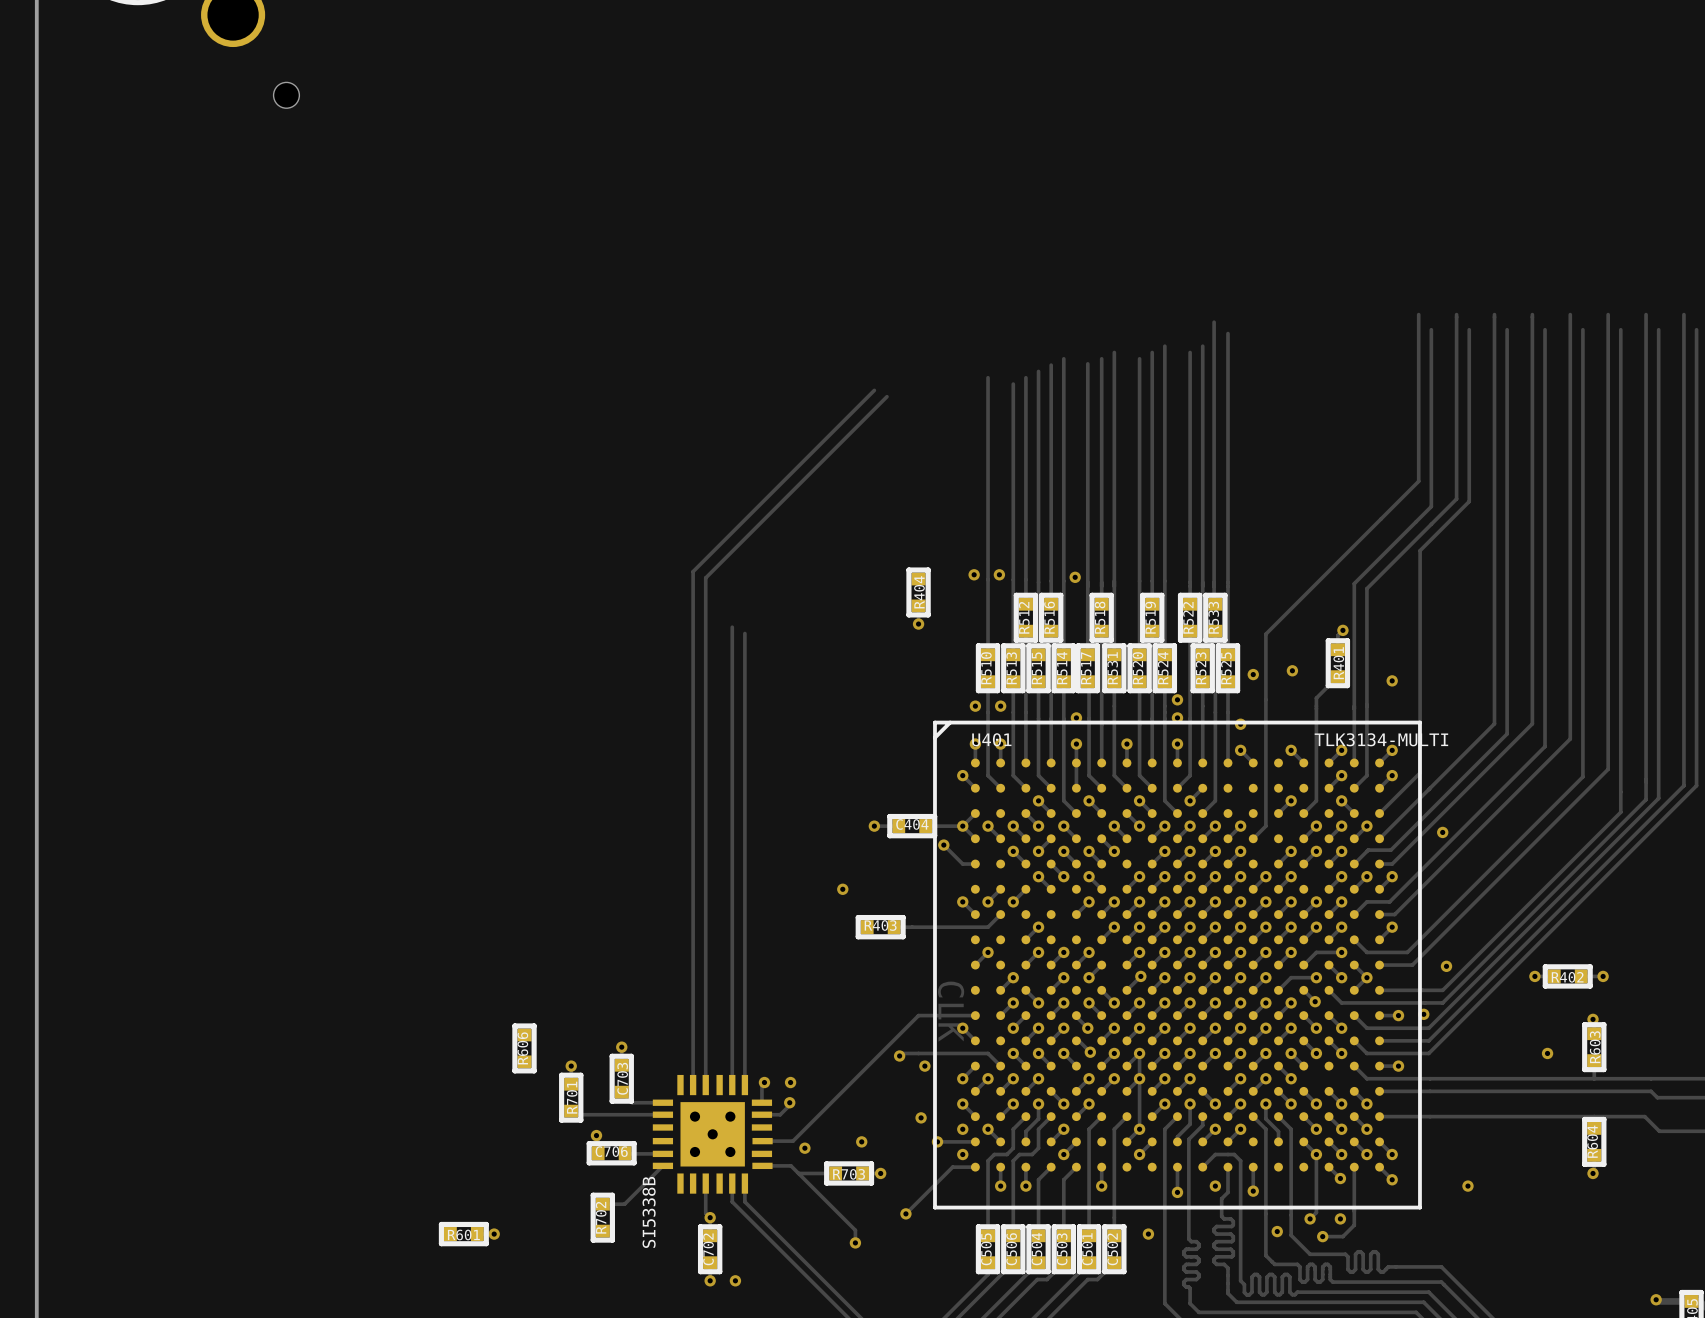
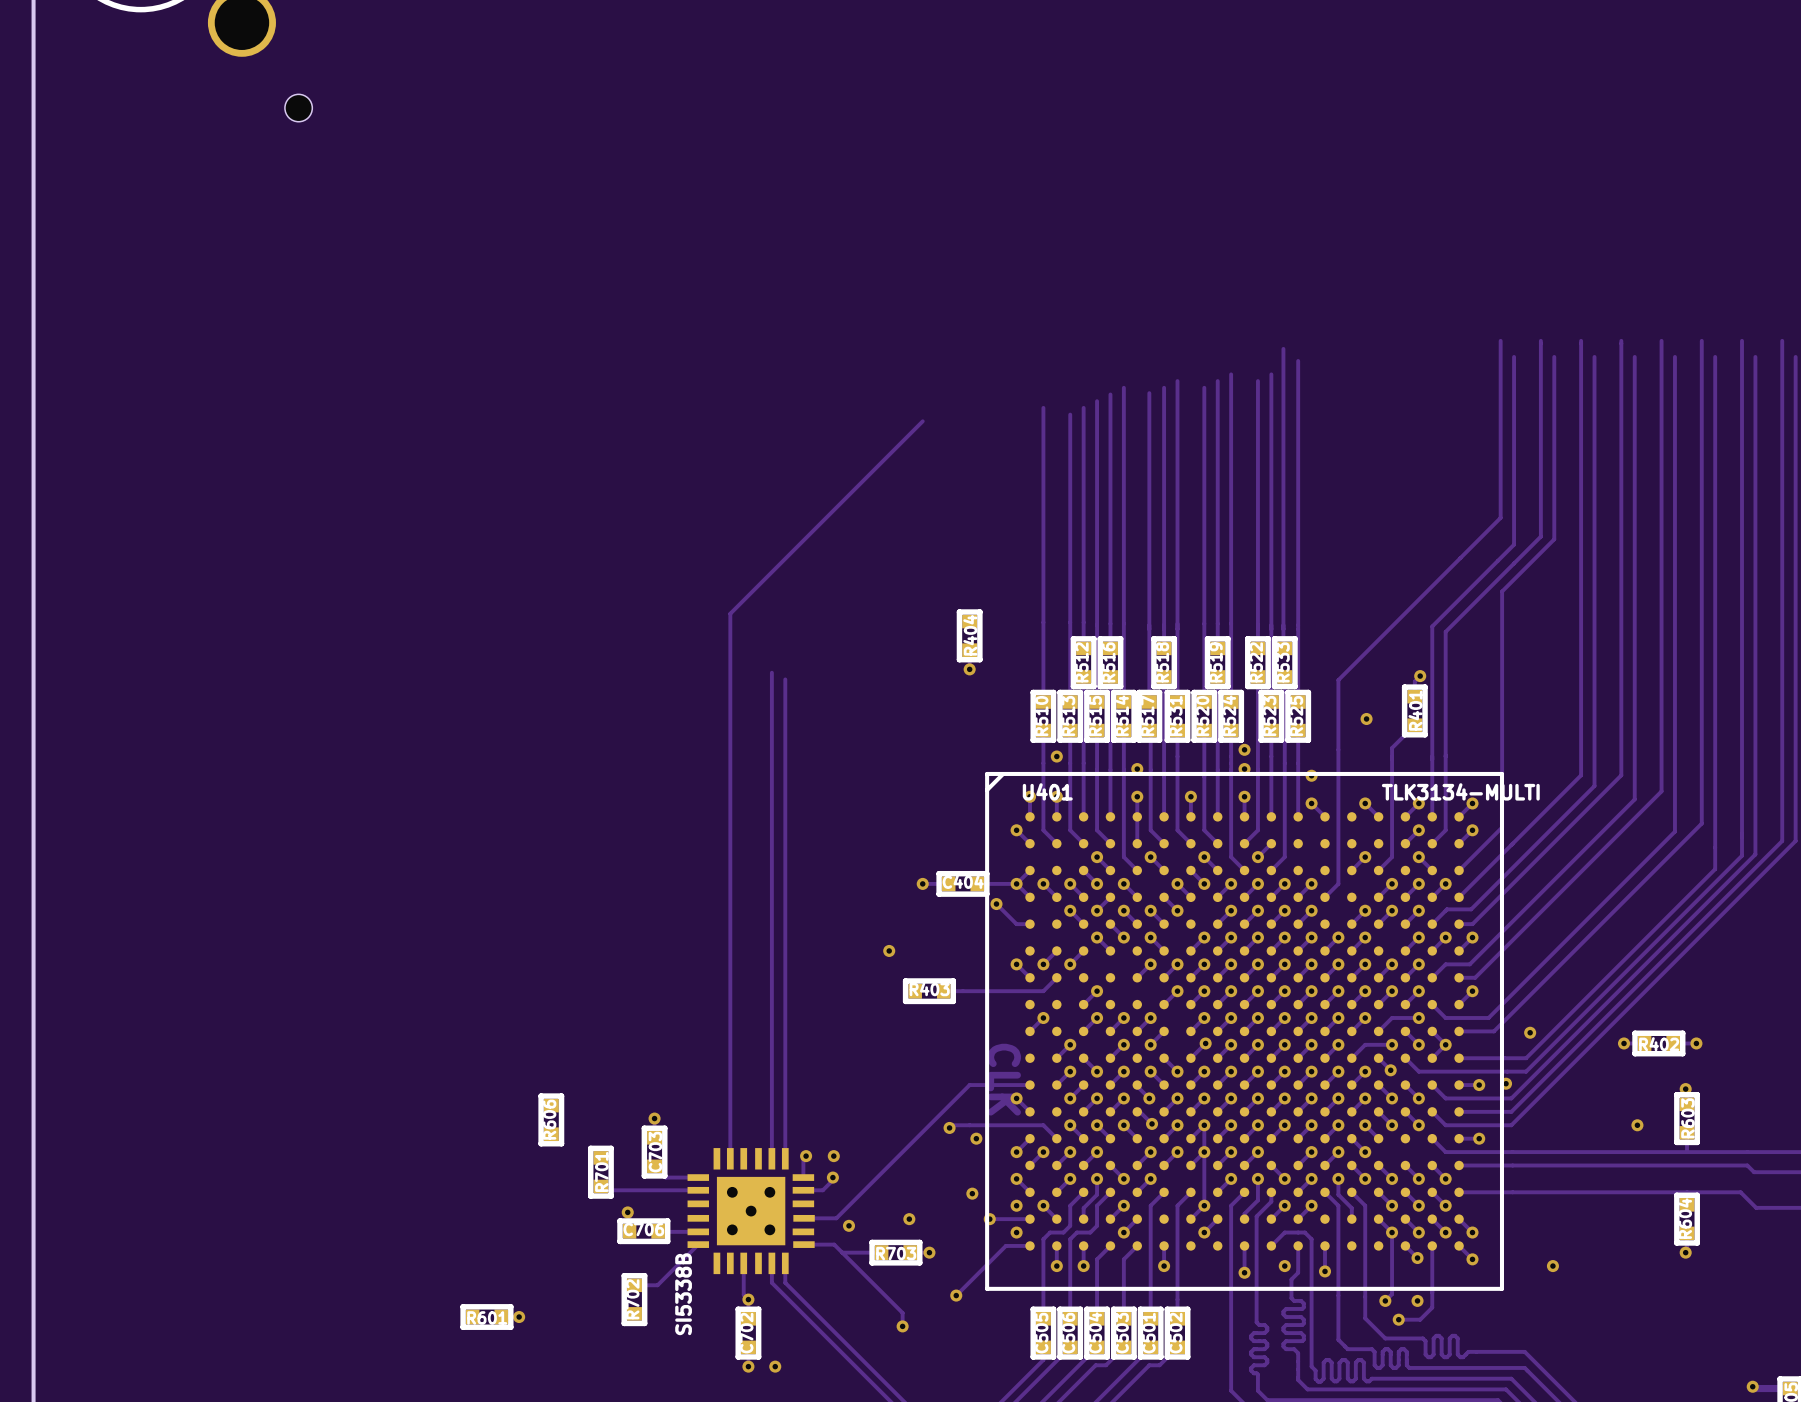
track: (886, 396) (705, 577) (705, 1085) -> none
via: (974, 574) -> none
via: (999, 574) -> none
via: (1075, 577) -> none
via: (1253, 674) -> none
via: (1392, 680) -> none
via: (975, 706) -> none
via: (1442, 832) -> none
via: (571, 1066) -> none
via: (1277, 1231) -> none
via: (1148, 1234) -> none

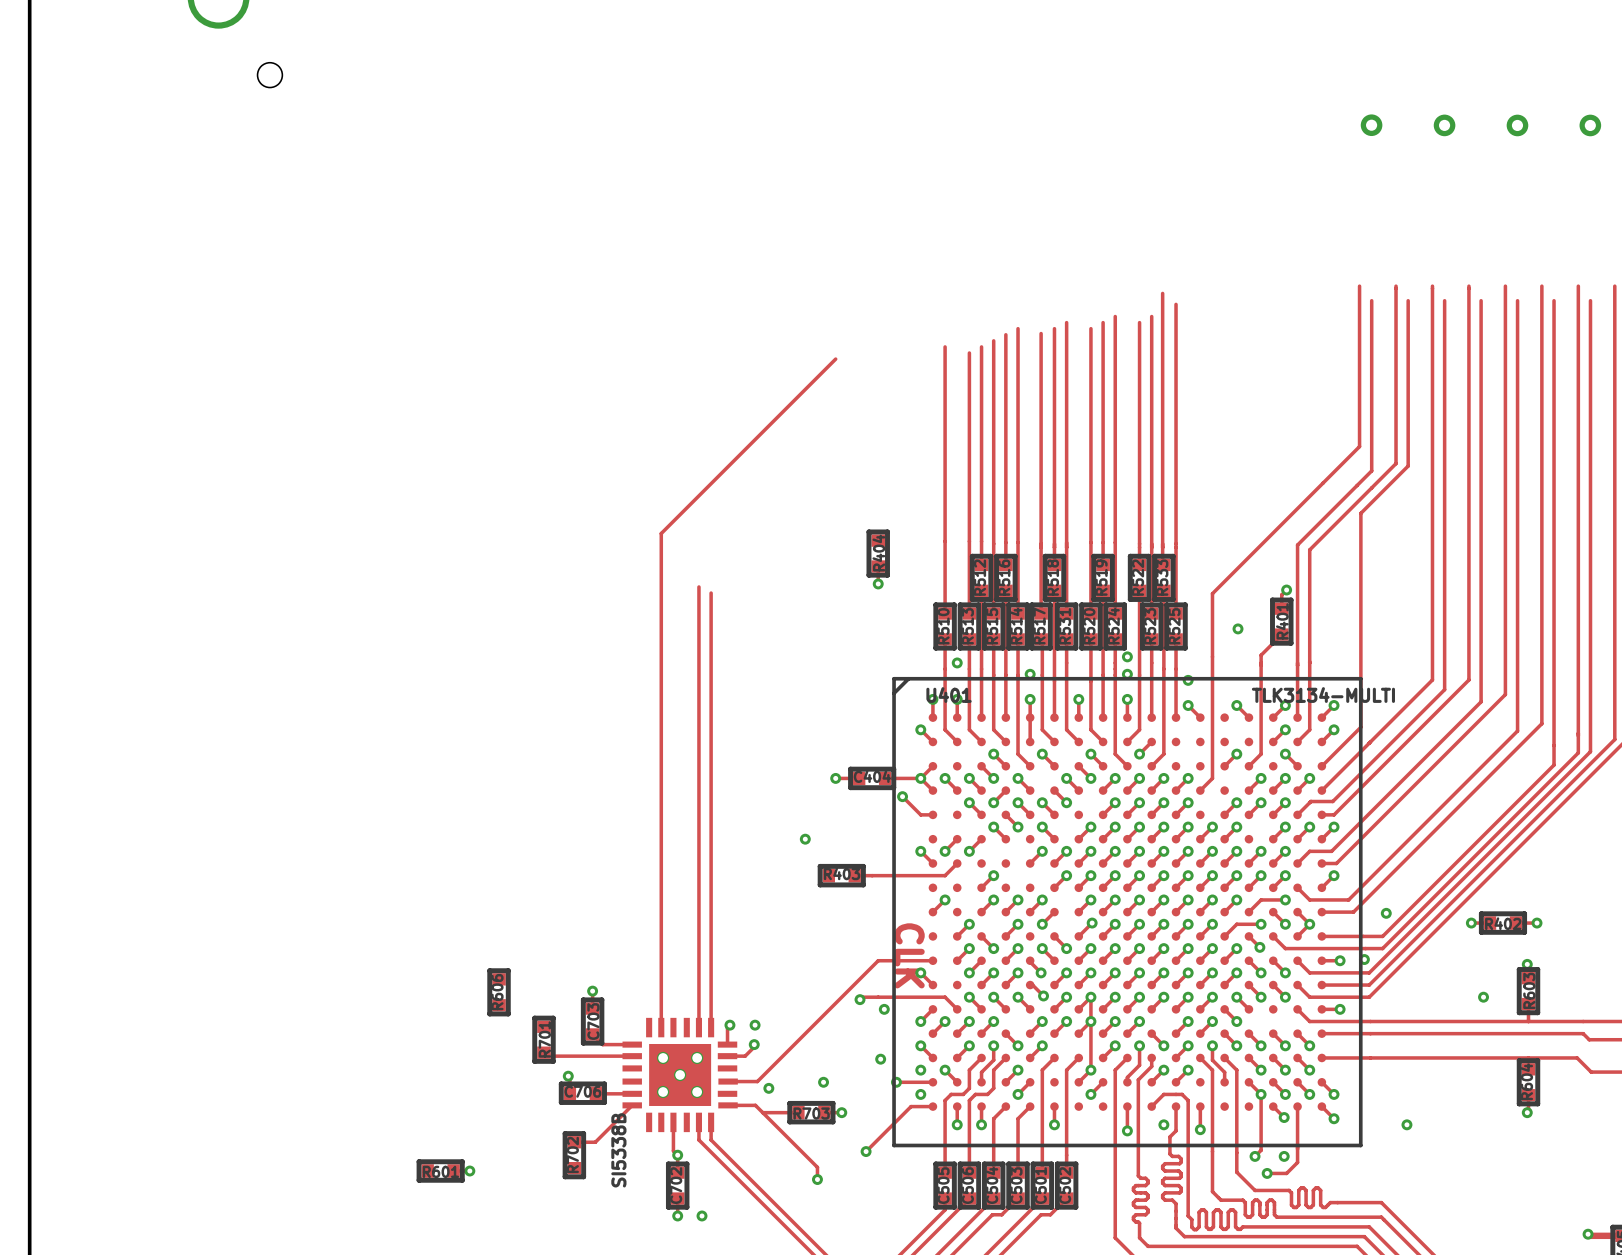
via: none -> (1371, 125)
via: none -> (1444, 125)
via: none -> (1517, 125)
via: none -> (1590, 125)

